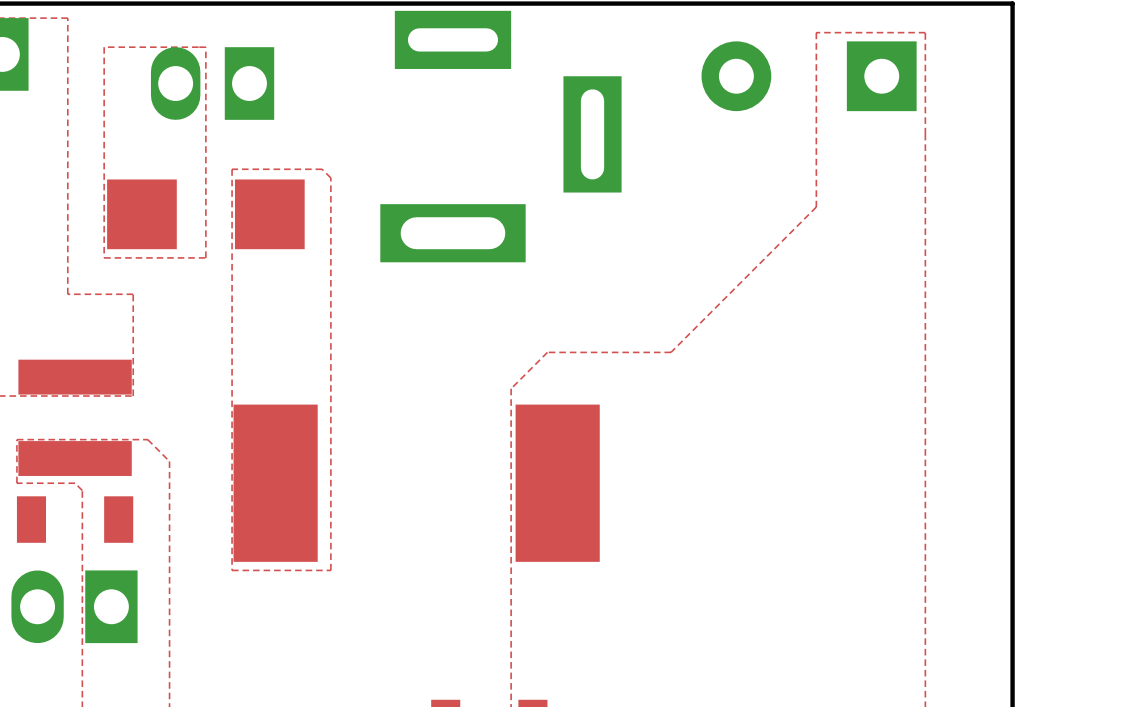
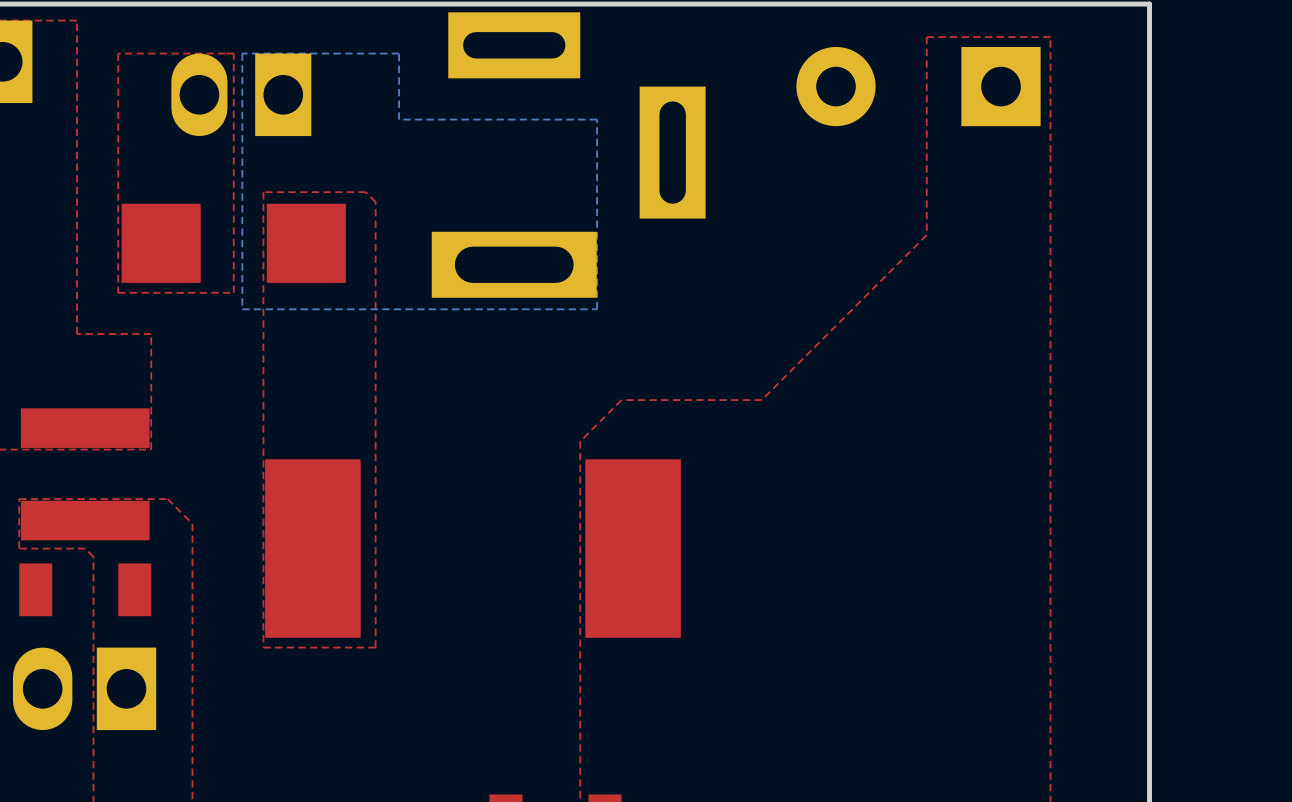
bottom zone outline: none -> (399, 53) (399, 119) (597, 119) (597, 309) (242, 309) (242, 53) (399, 53)

